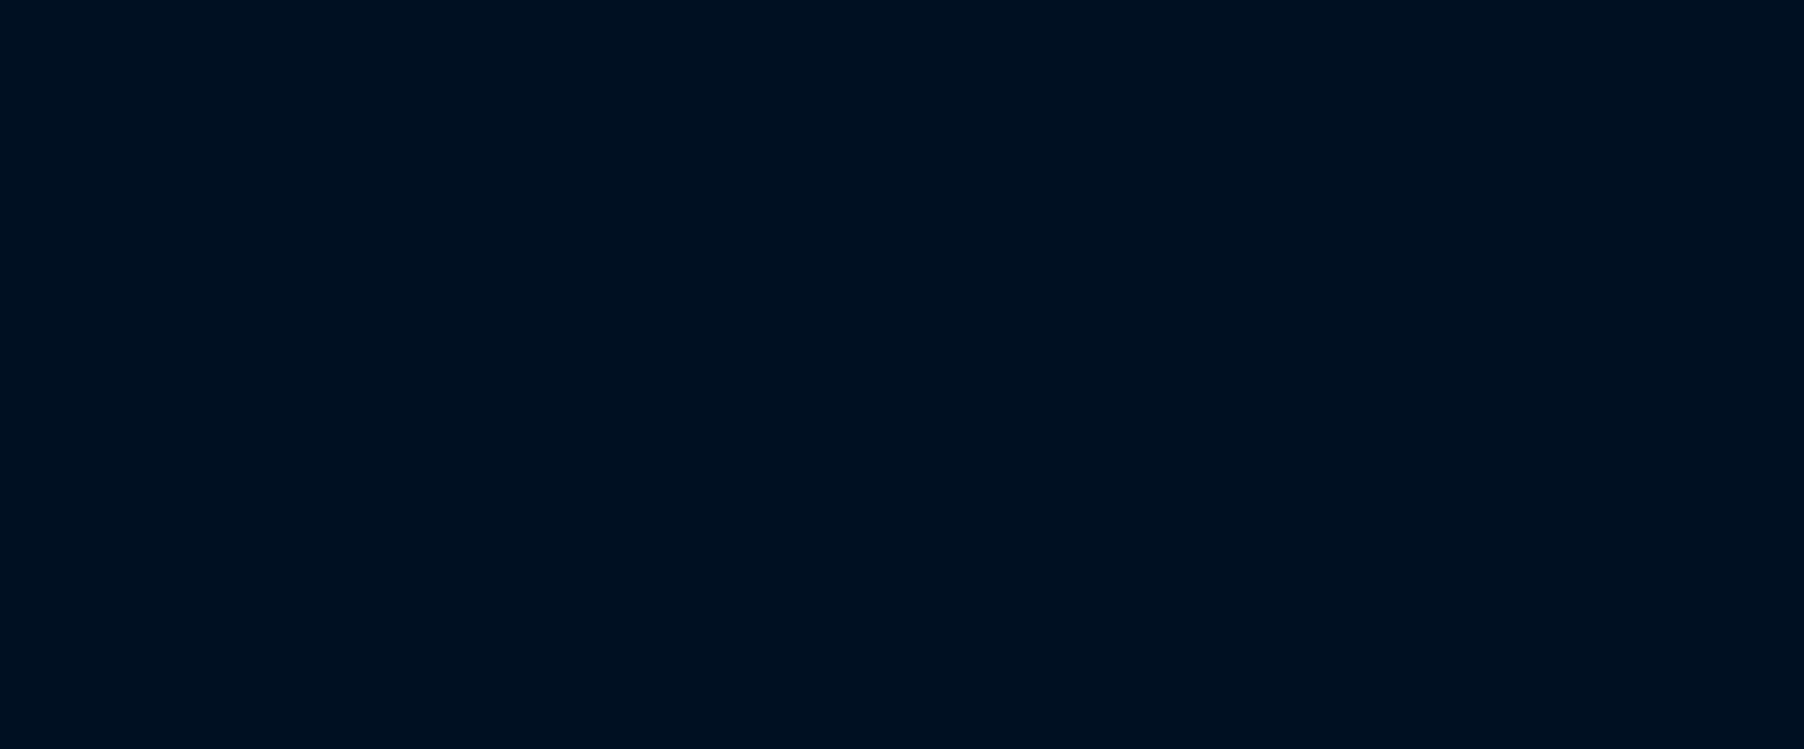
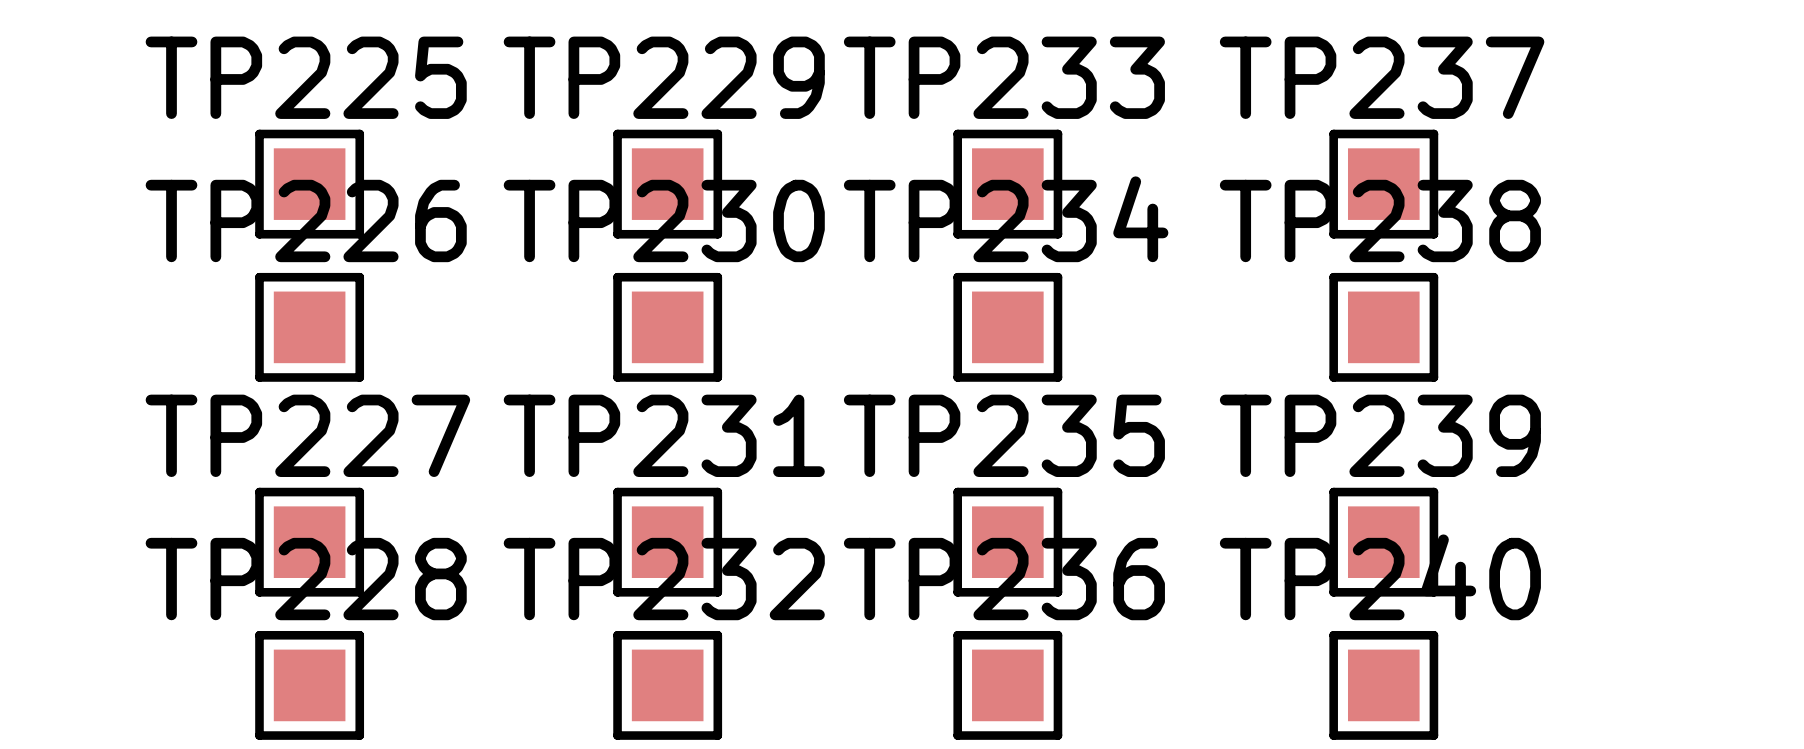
TP225: none -> (309, 184)
TP229: none -> (667, 184)
TP233: none -> (1007, 184)
TP237: none -> (1383, 184)
TP226: none -> (309, 327)
TP230: none -> (667, 327)
TP234: none -> (1007, 327)
TP238: none -> (1383, 327)
TP227: none -> (309, 542)
TP231: none -> (667, 542)
TP235: none -> (1007, 542)
TP239: none -> (1383, 542)
TP228: none -> (309, 685)
TP232: none -> (667, 685)
TP236: none -> (1007, 685)
TP240: none -> (1383, 685)

